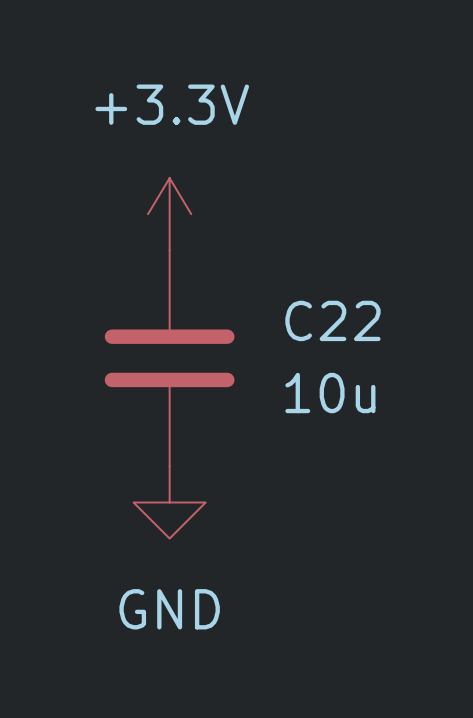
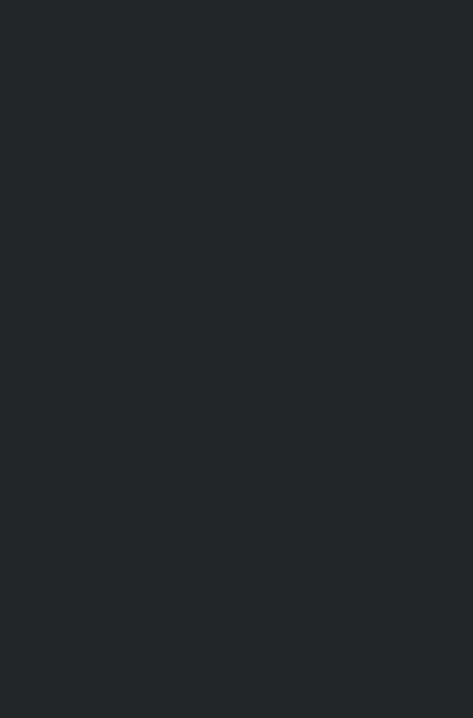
power symbol: +3.3V (169, 214) -> none
C22: 10u (169, 358) -> none
power symbol: GND (169, 502) -> none

